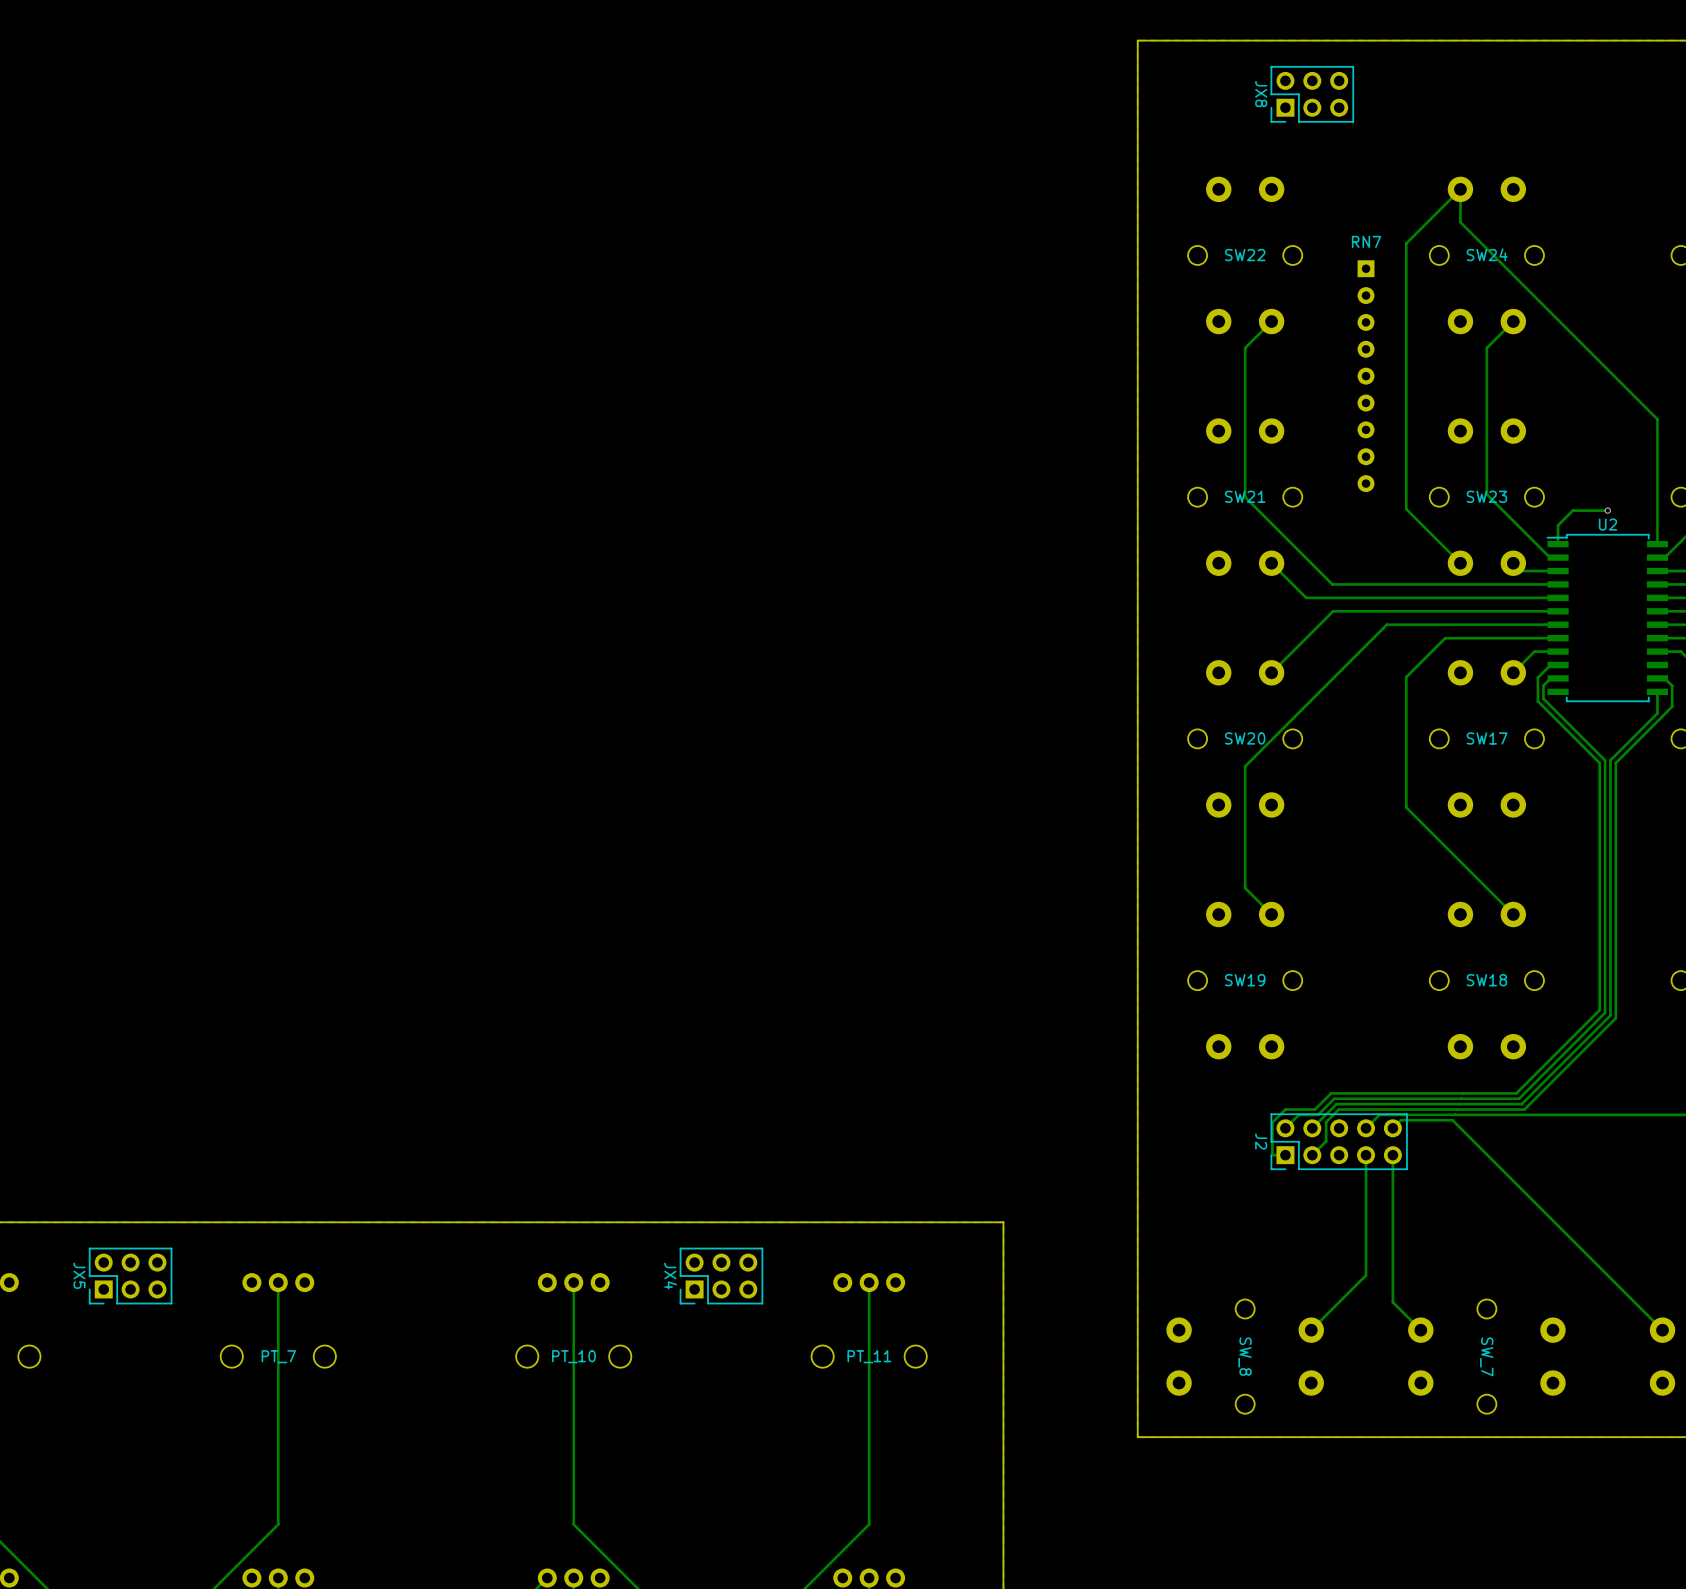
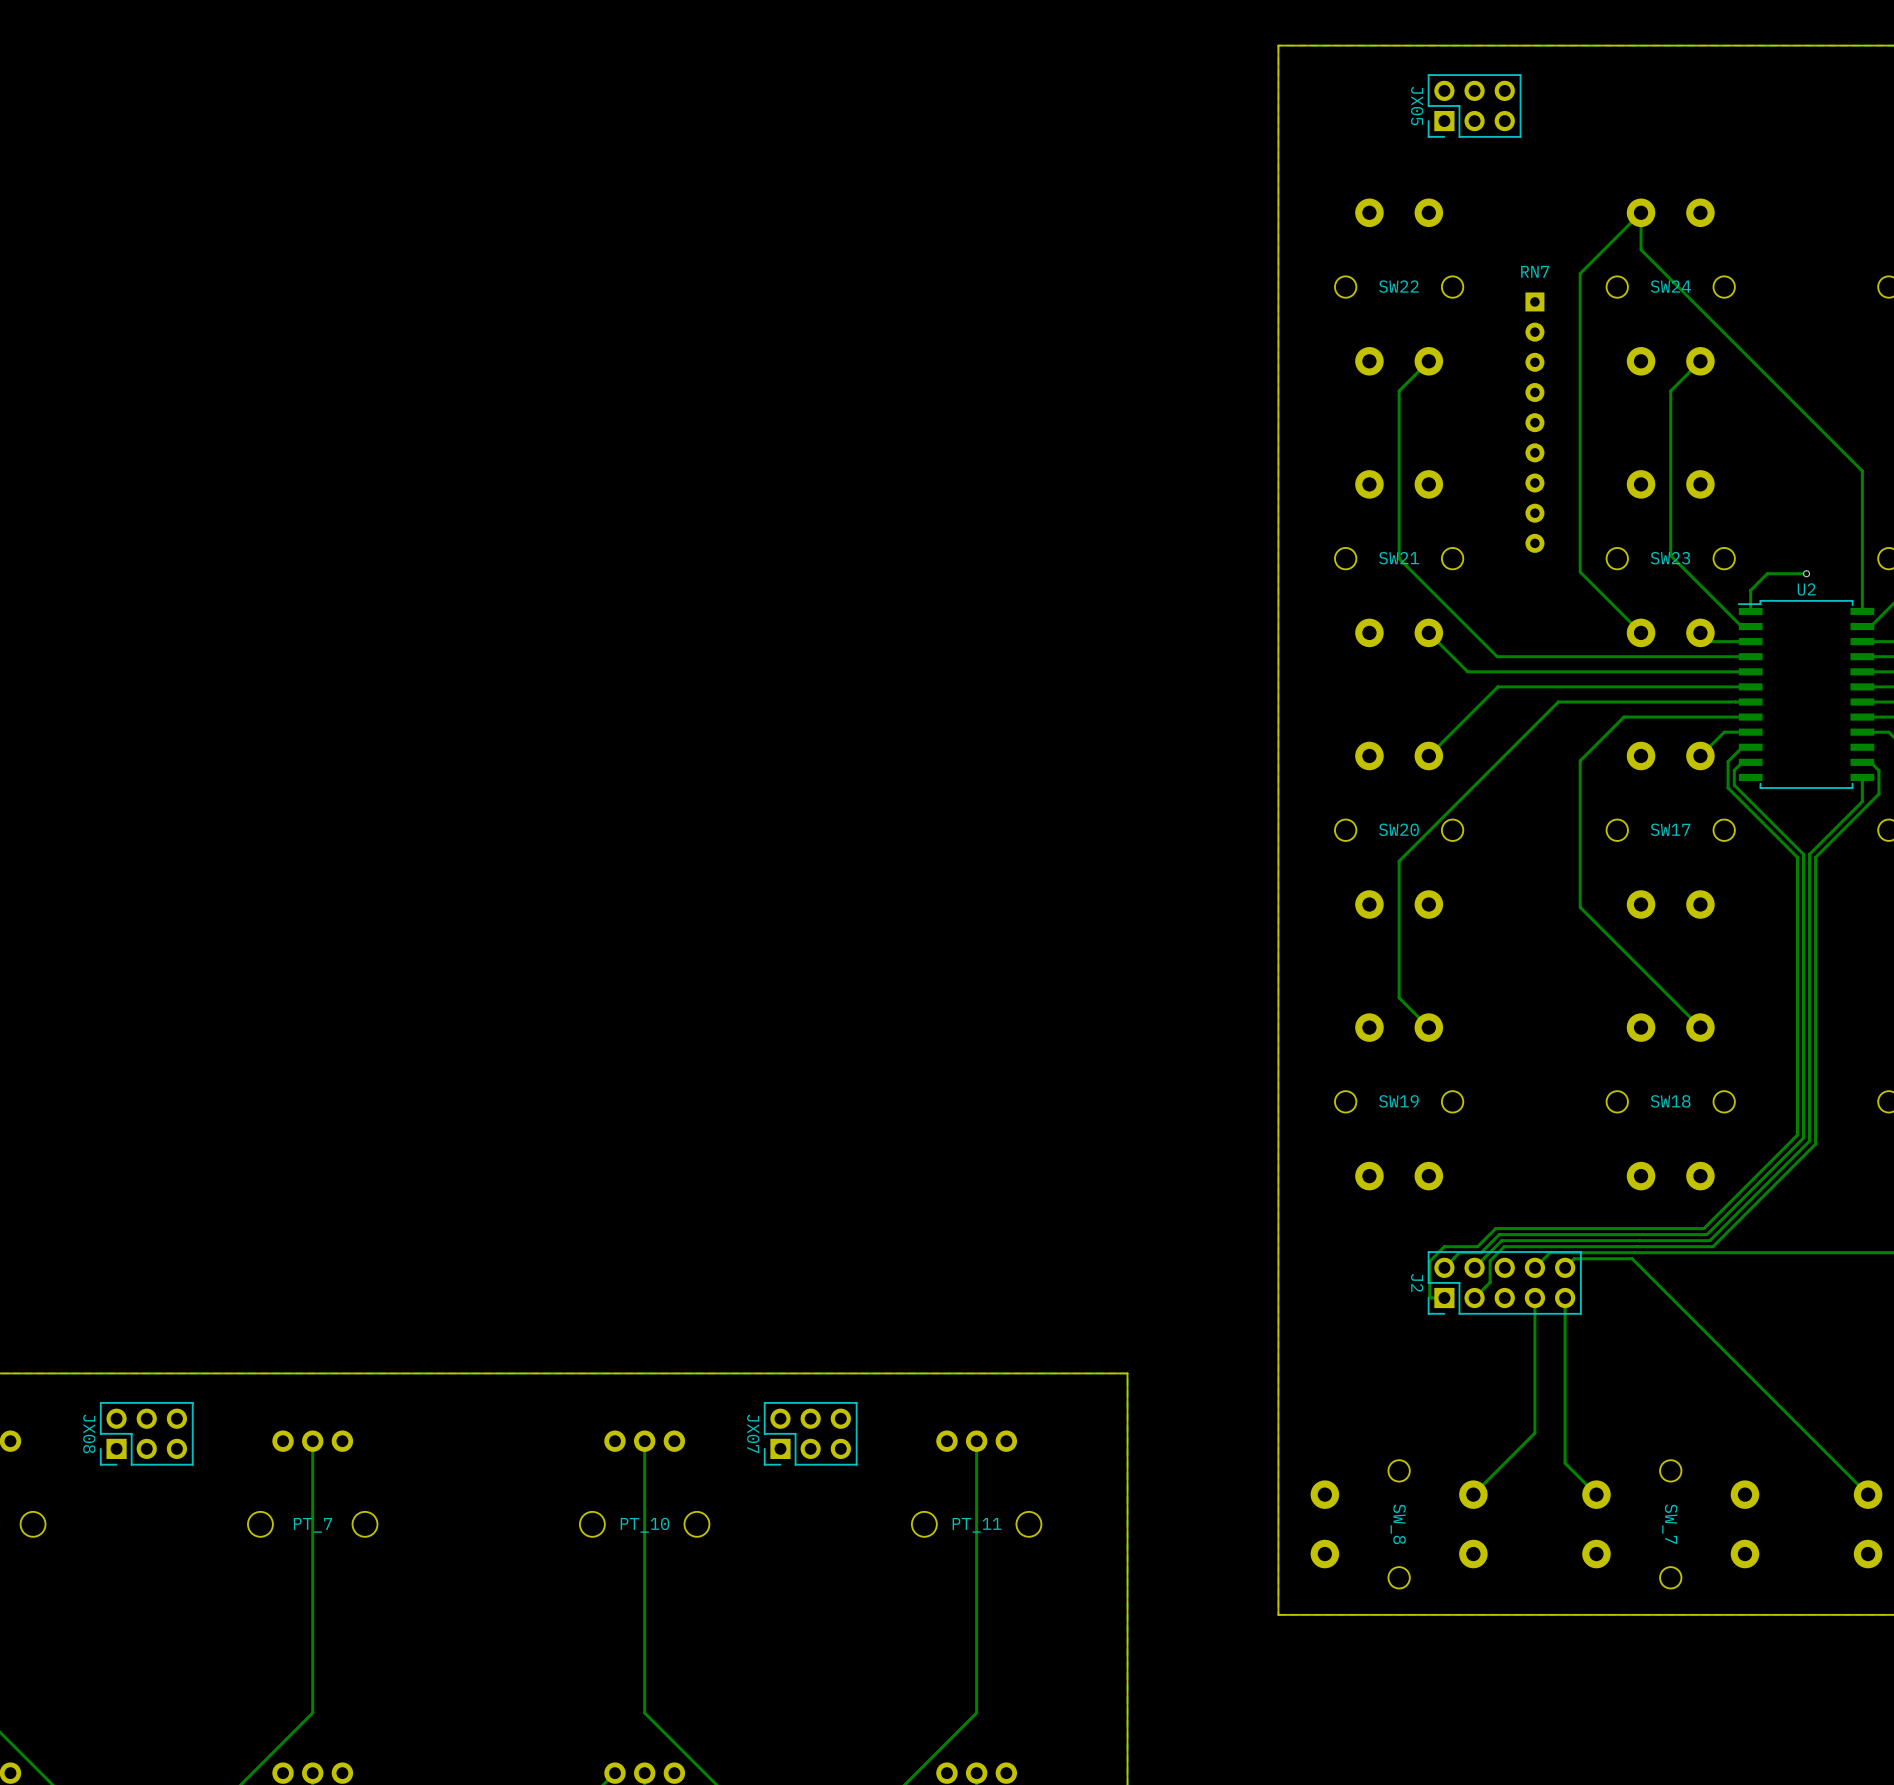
JX8 name: JX8 (1261, 94) -> JX05 (1417, 106)
JX5 name: JX5 (79, 1275) -> JX08 (89, 1433)
JX4 name: JX4 (670, 1276) -> JX07 (753, 1433)

